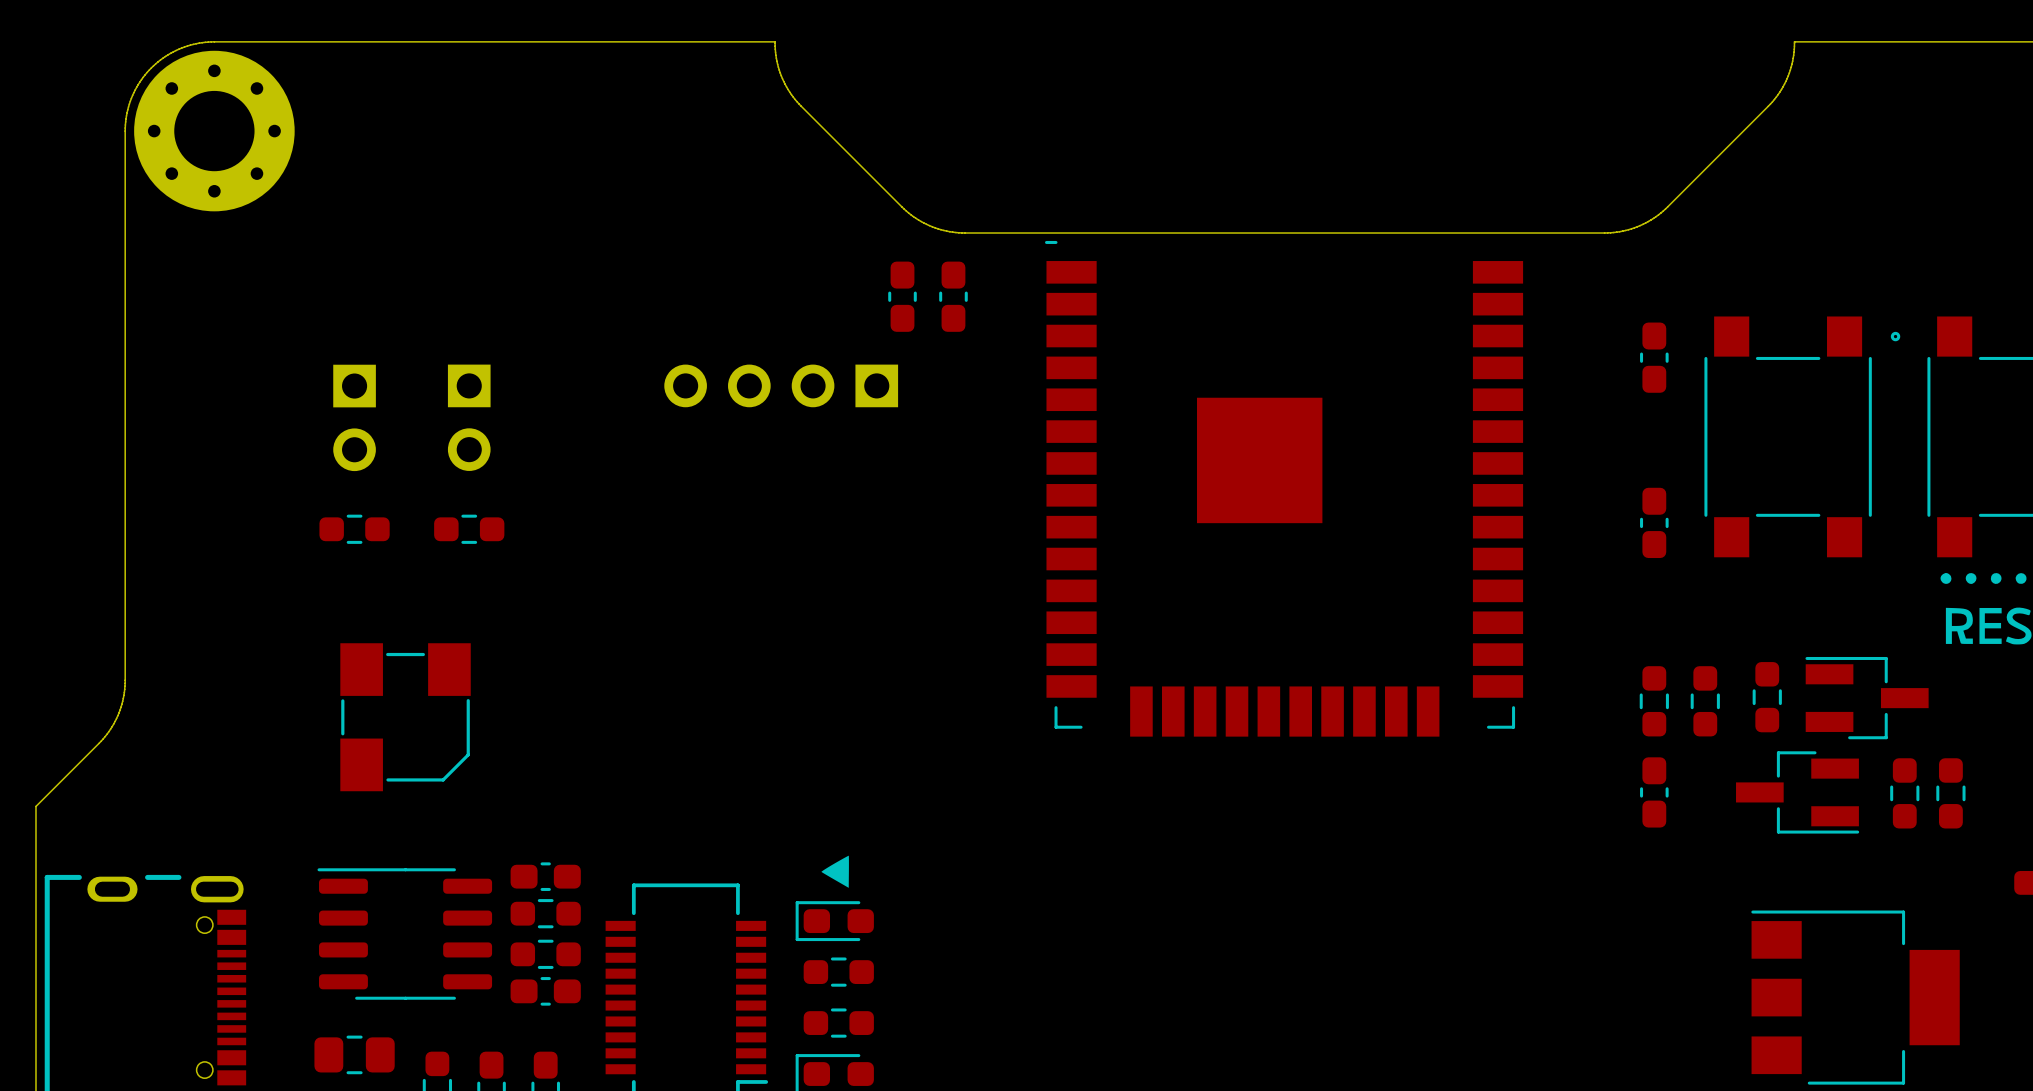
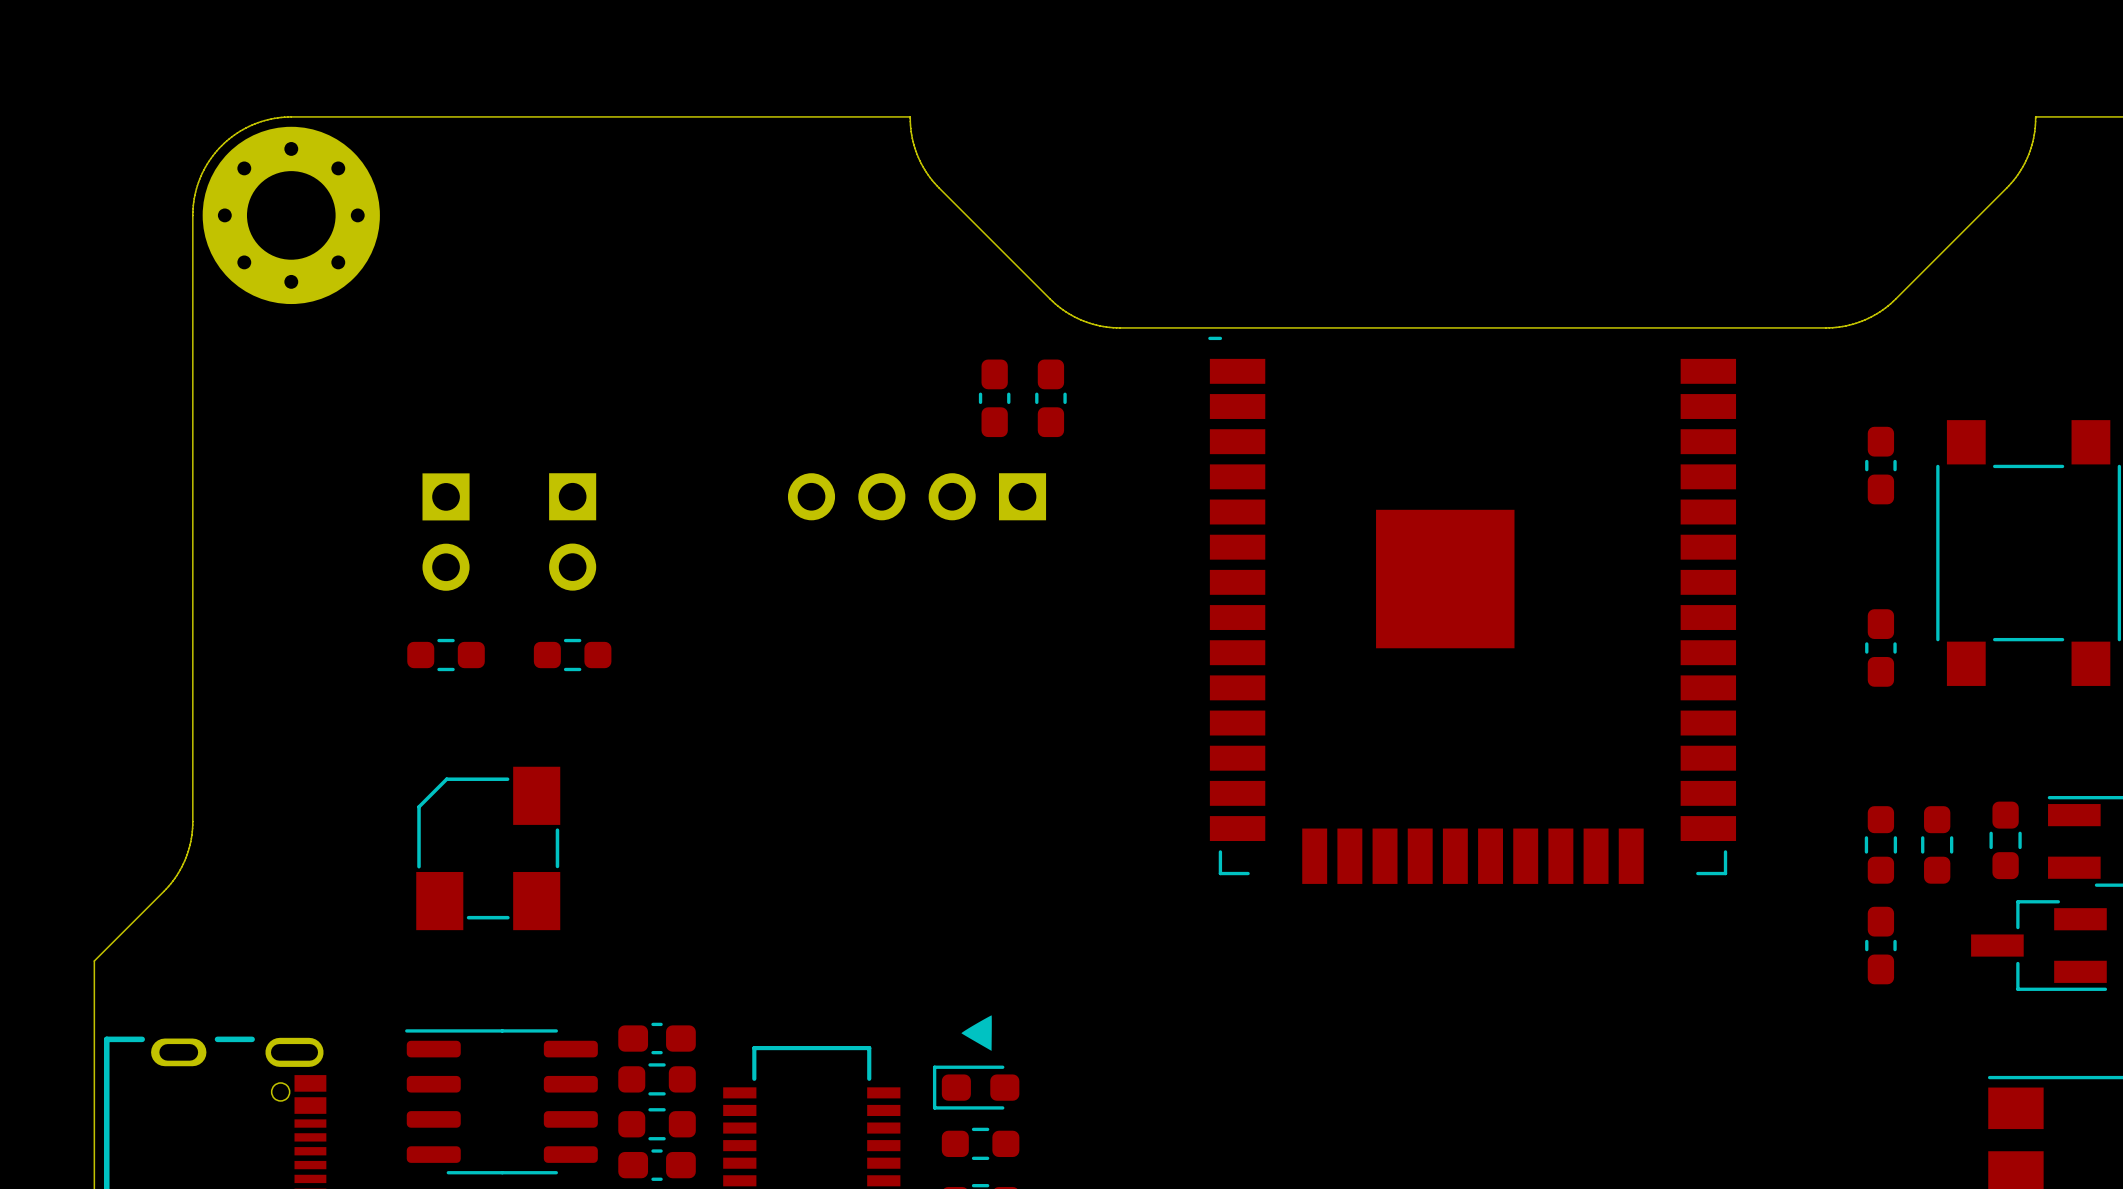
part position: (953, 296) -> (994, 398)
part rotation: 0° (405, 717) -> 180° (488, 848)

